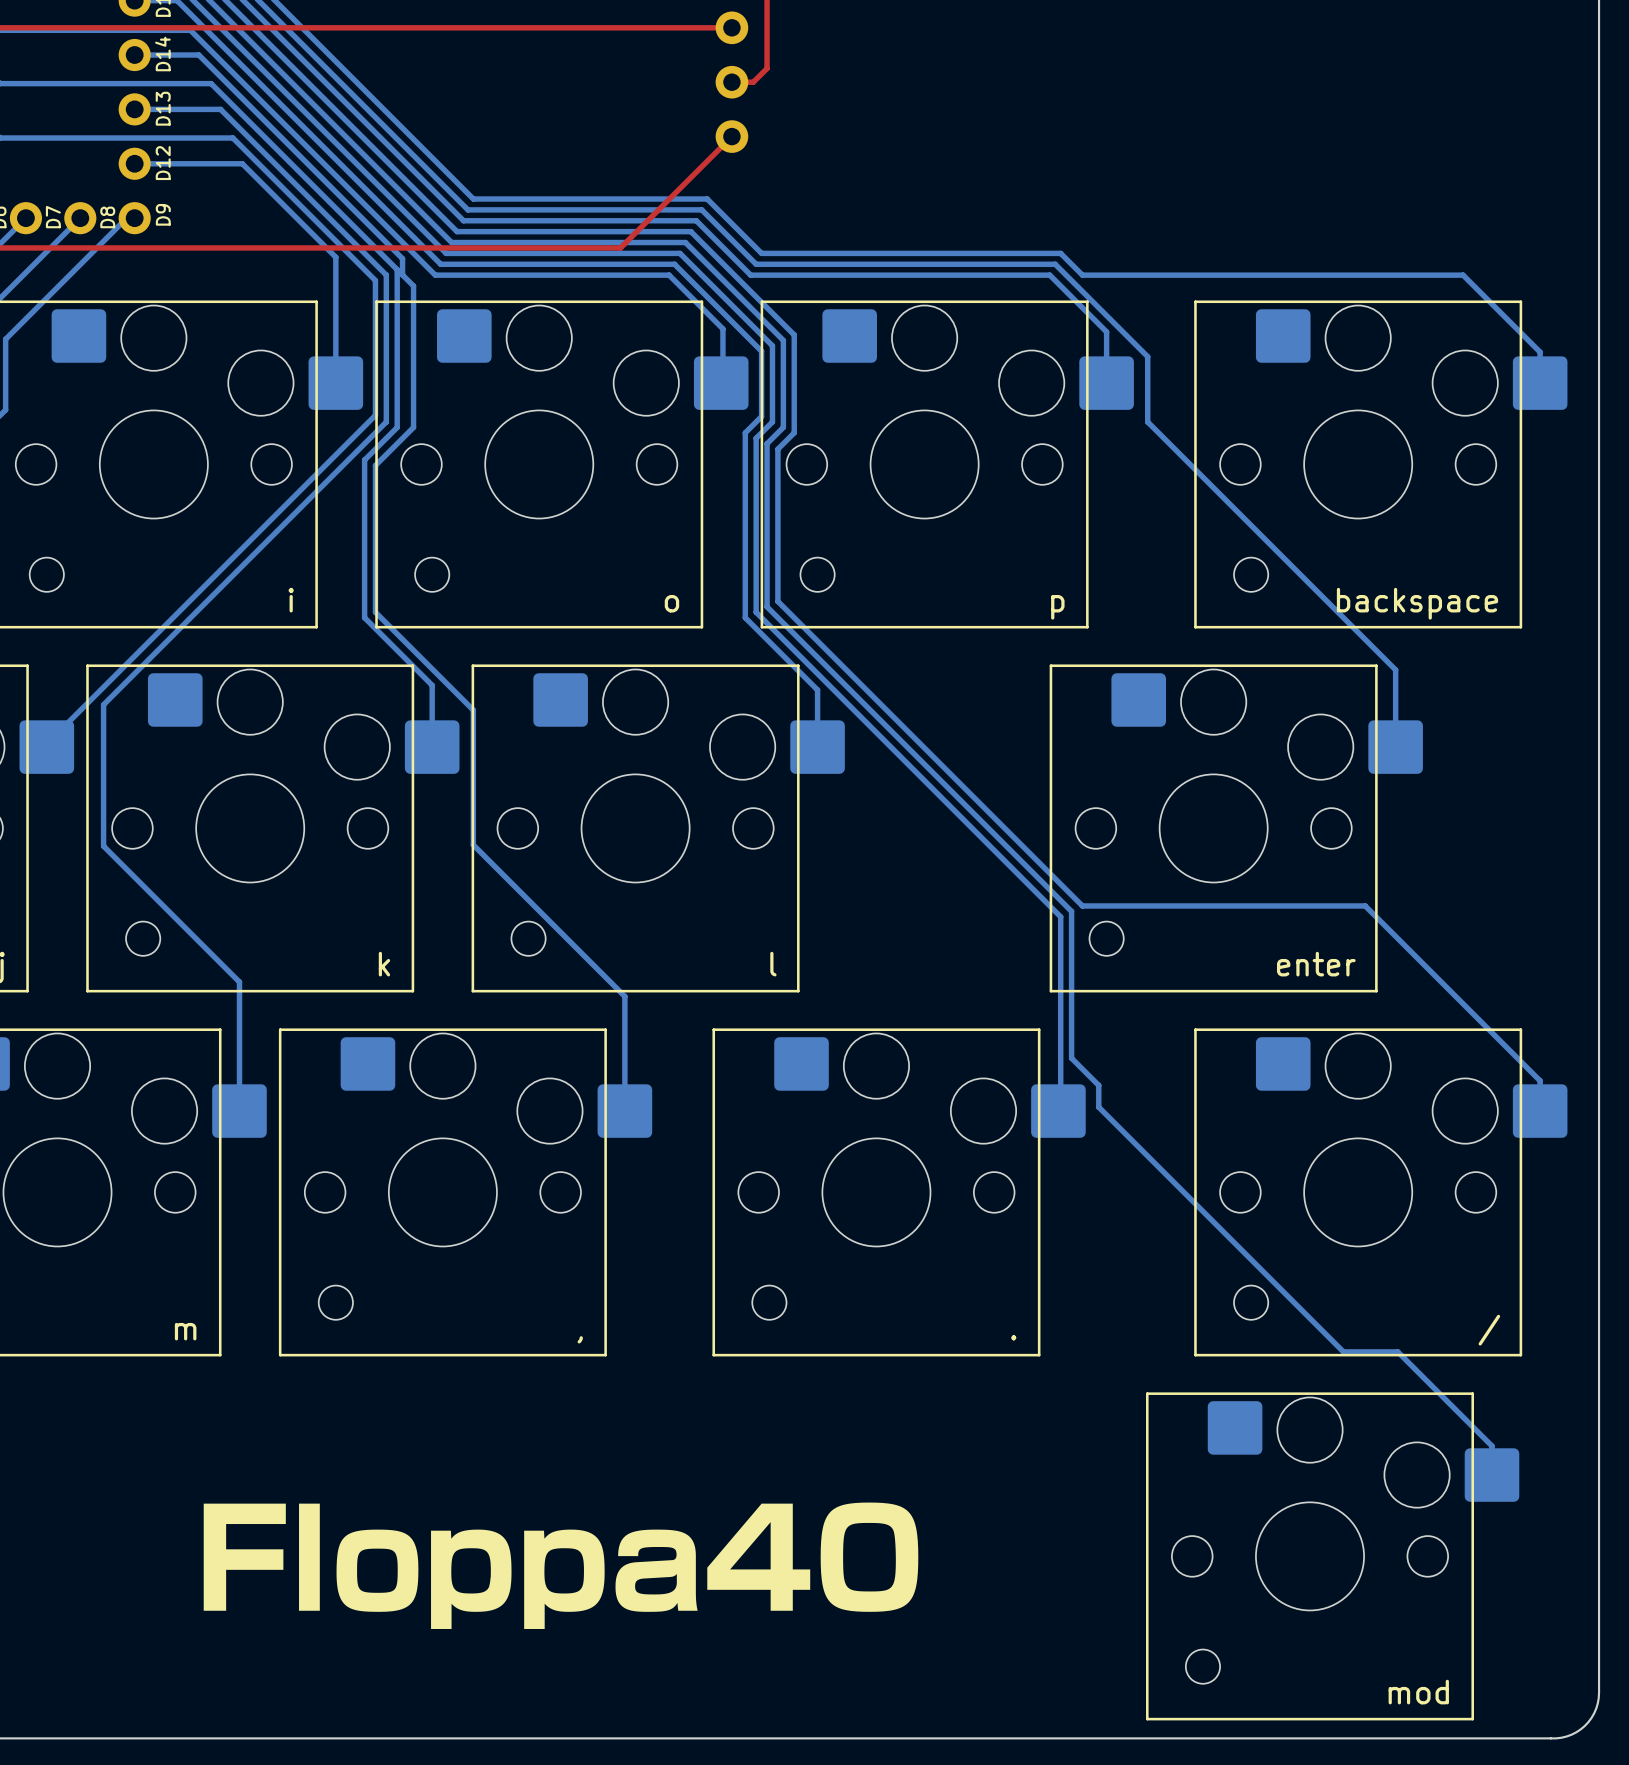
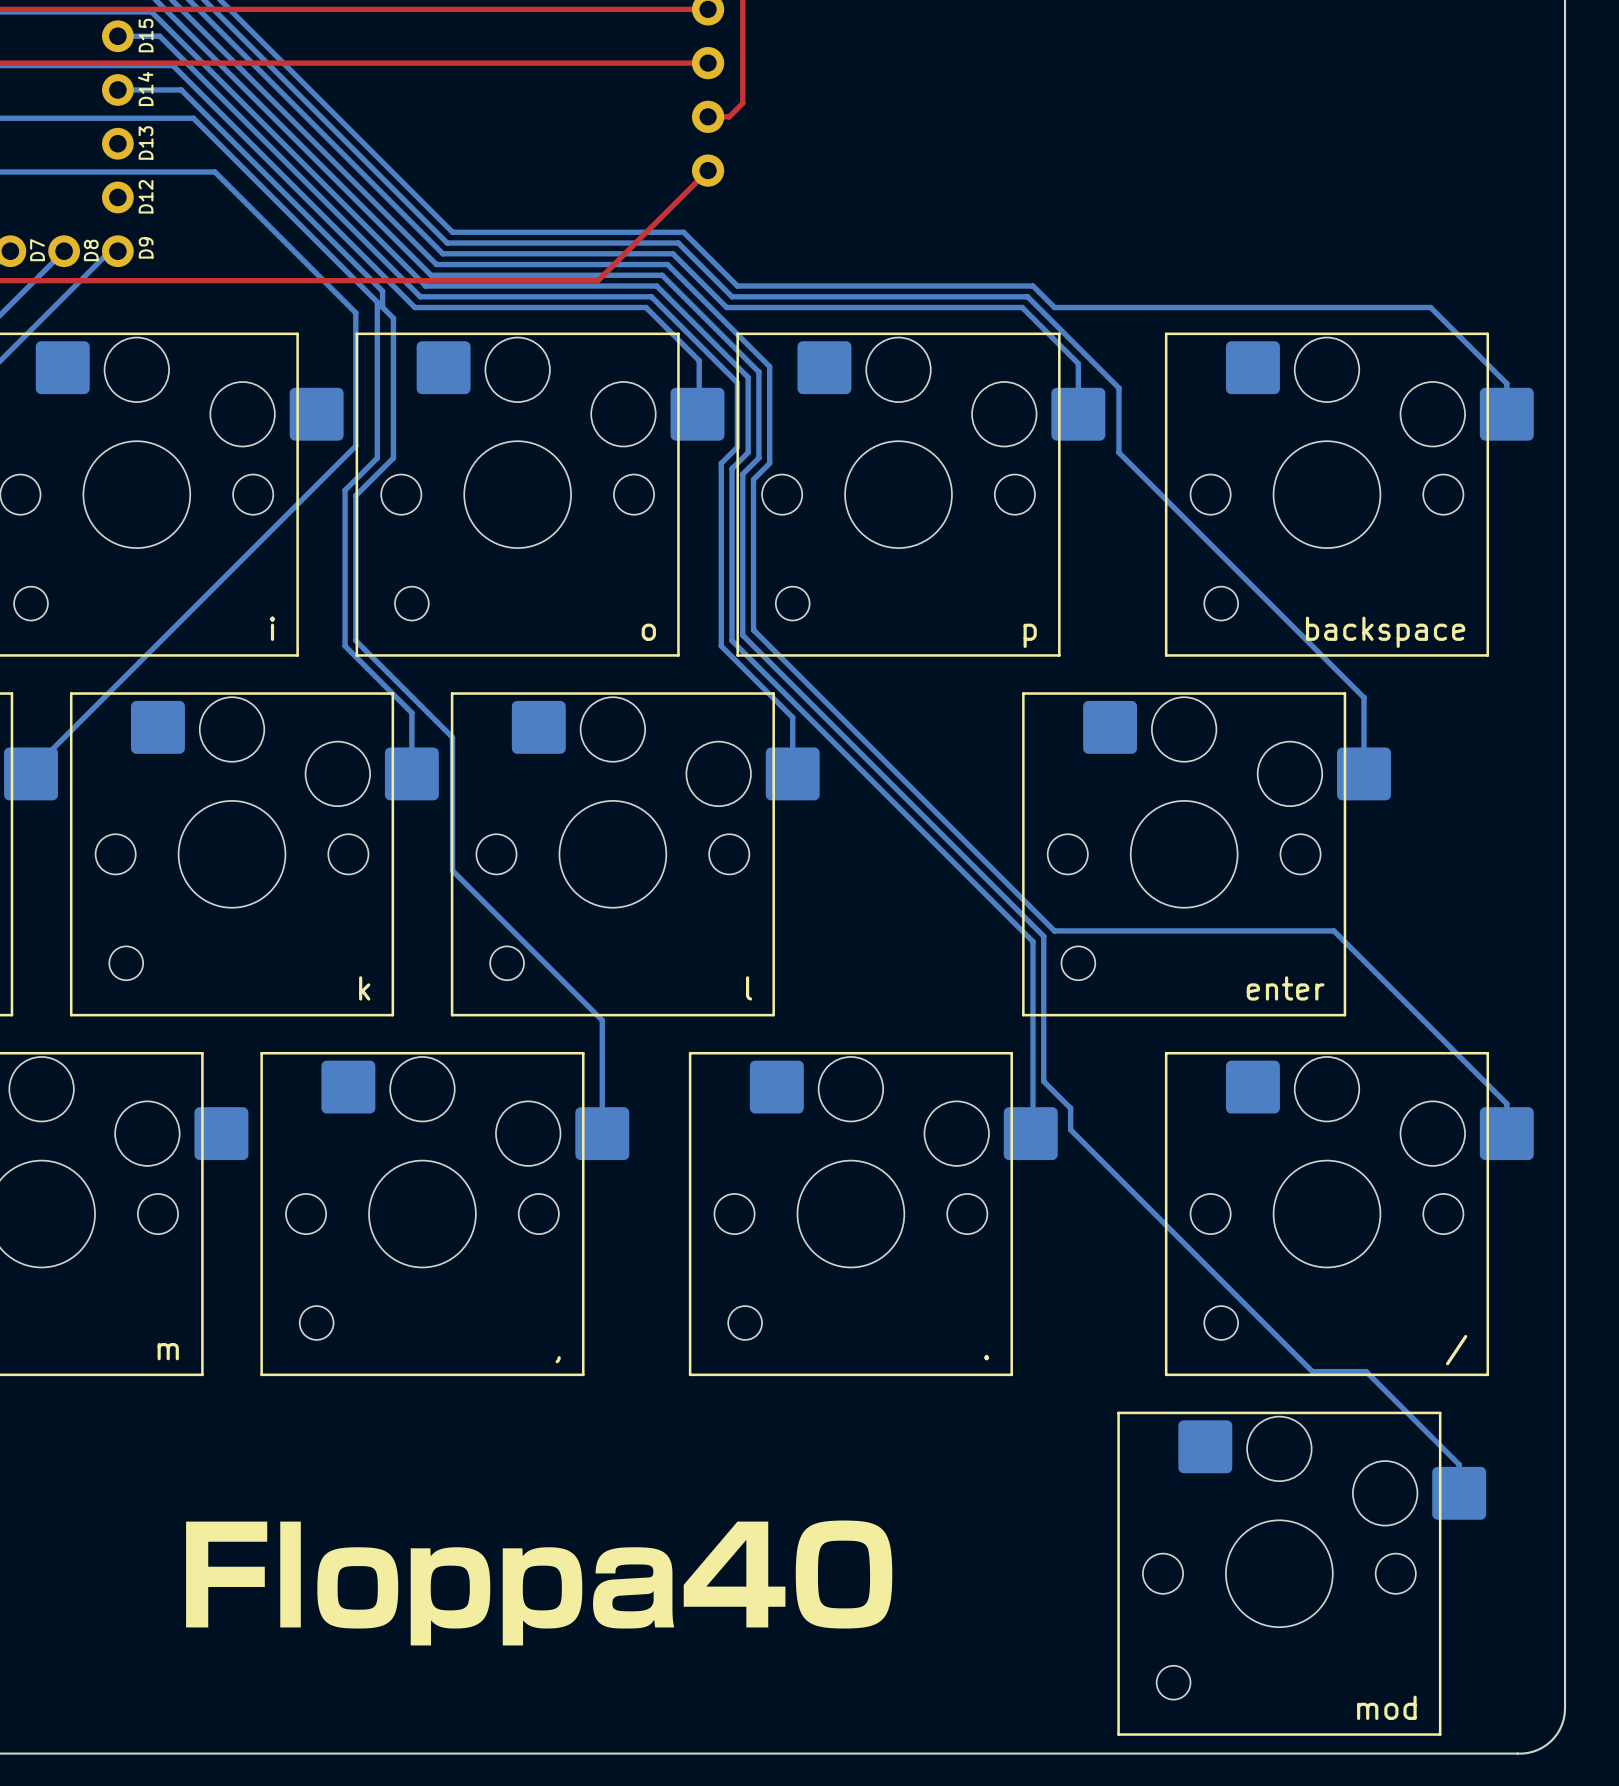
bottom track: (134, 109) (220, 109) (386, 275) (386, 422) (103, 704) (103, 846) (239, 982) (239, 1111) -> none
bottom track: (134, 163) (242, 163) (335, 257) (335, 383) -> none

